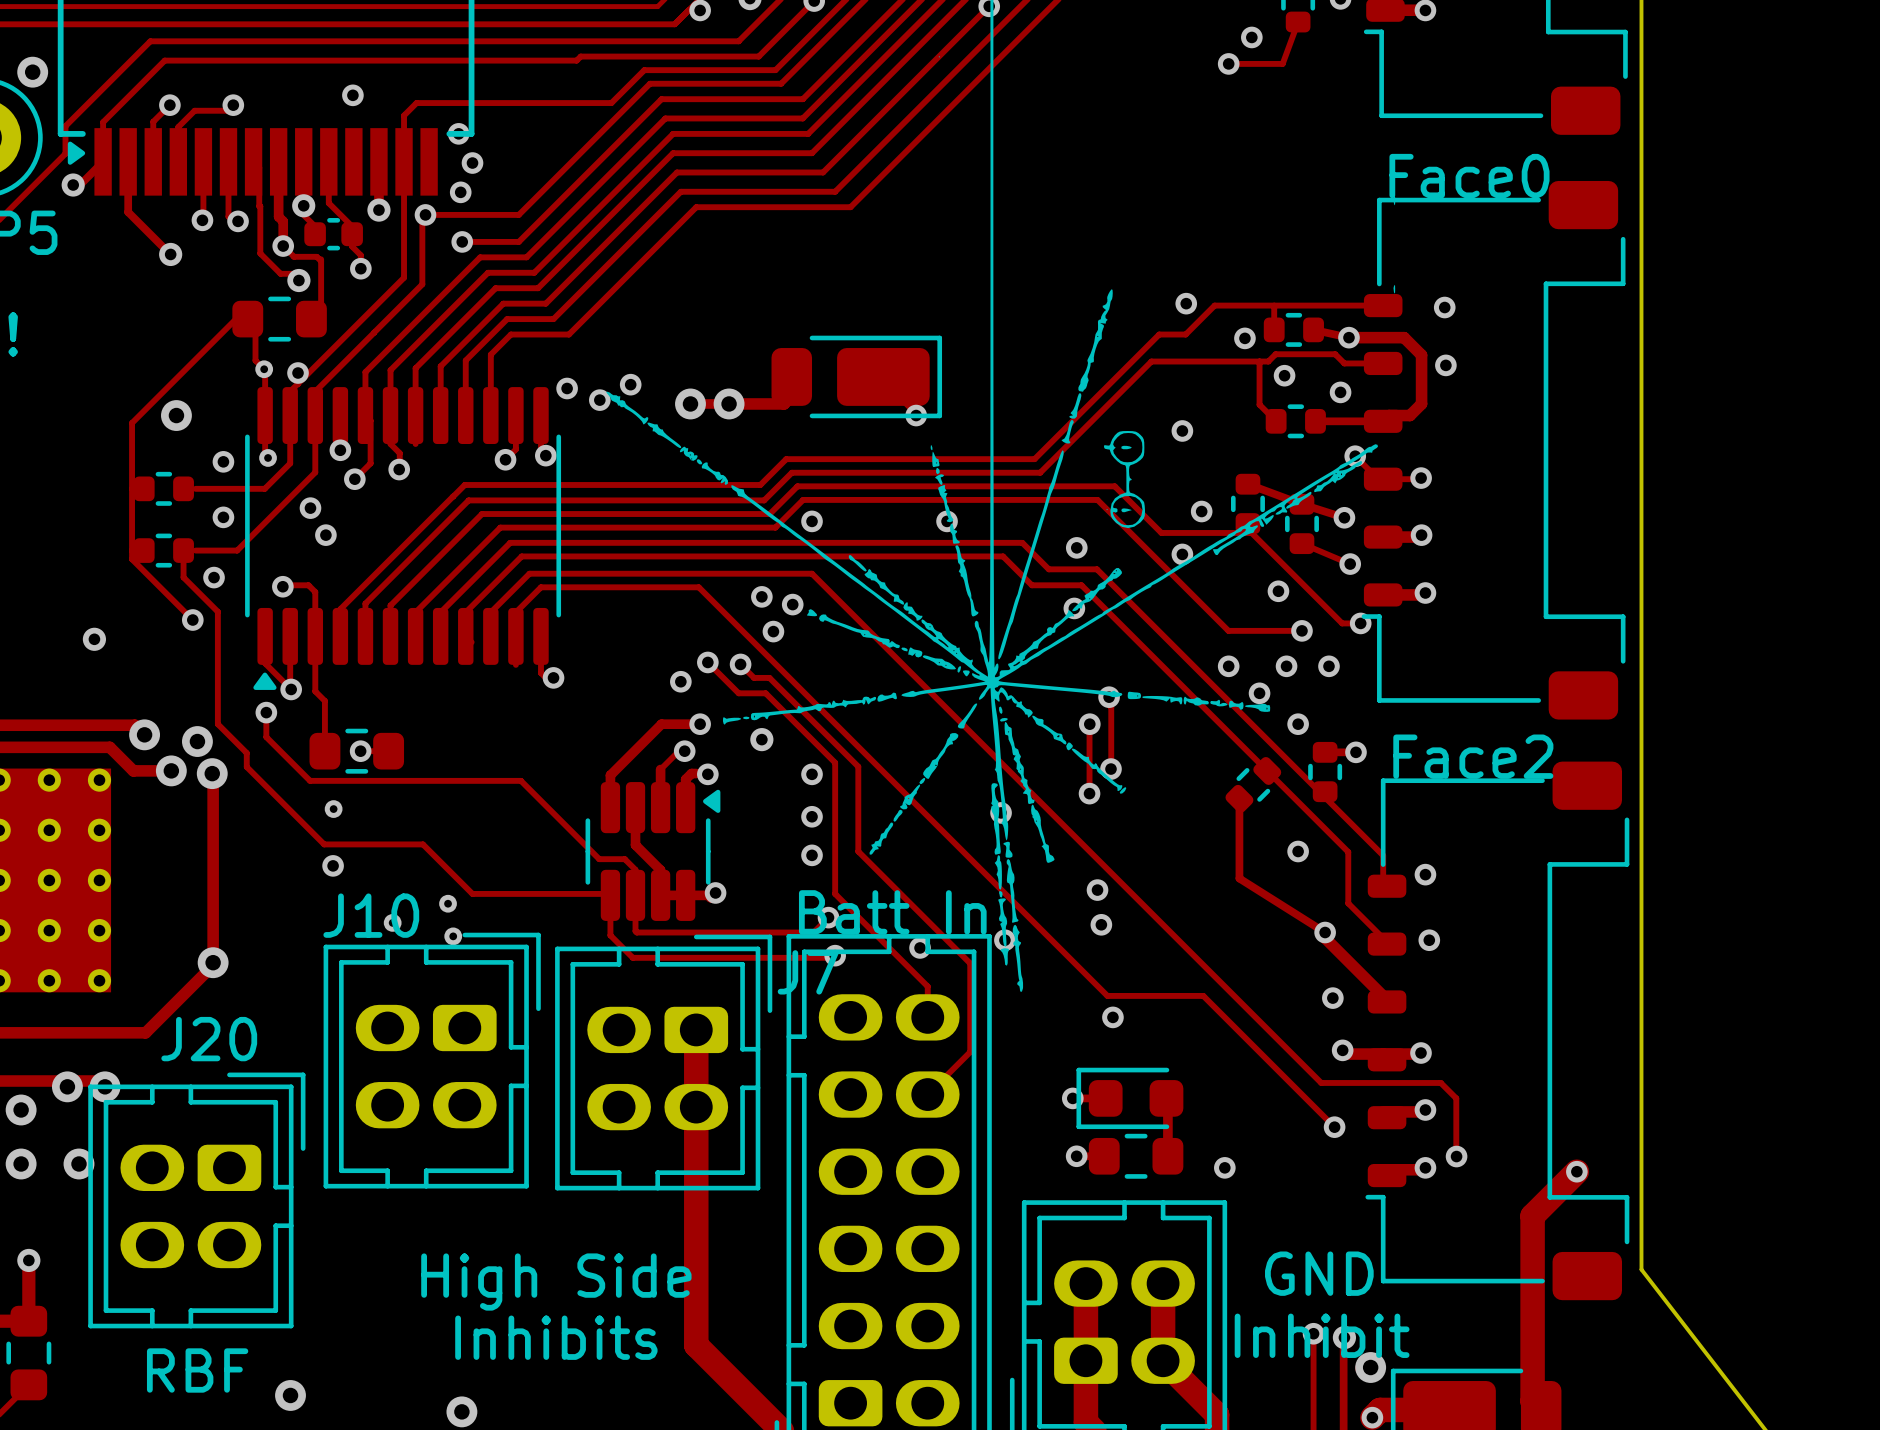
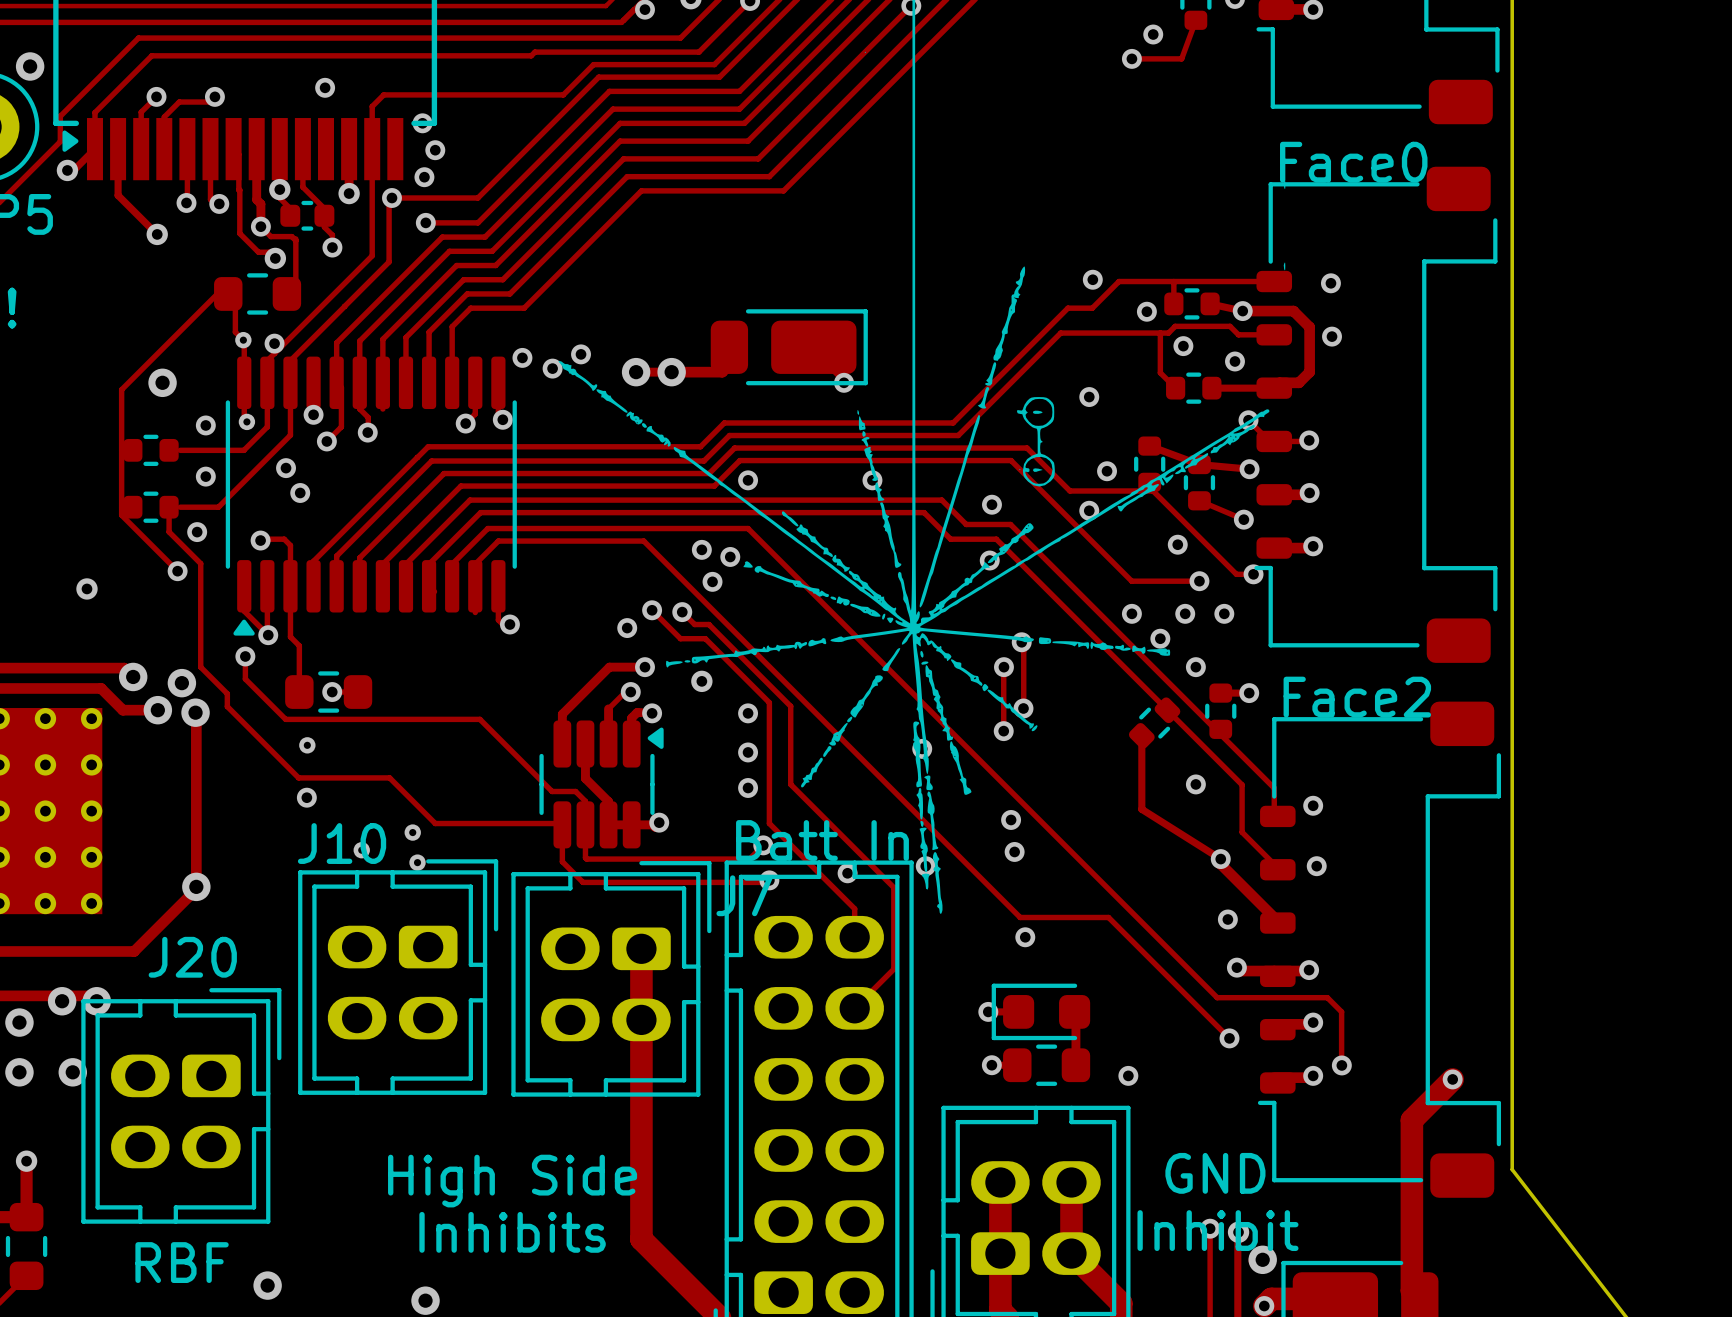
track: (1301, 504) (1344, 517) -> (1199, 464) (1249, 469)
via position: (1344, 517) -> (1249, 469)

